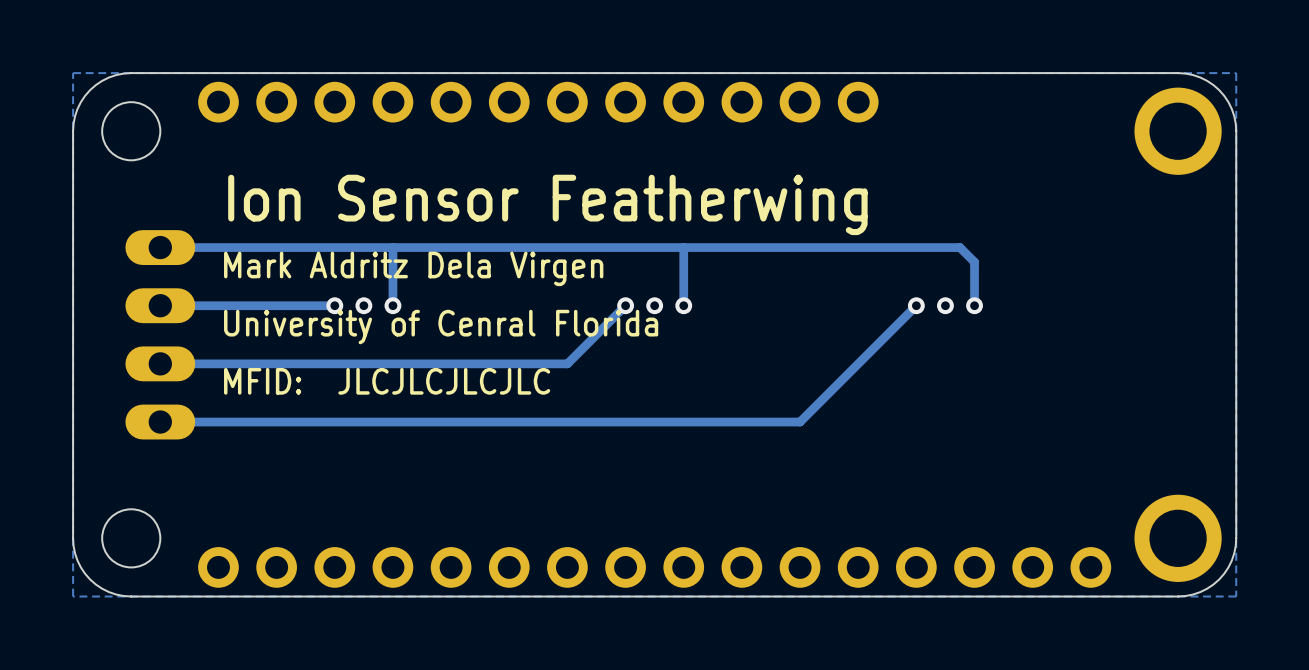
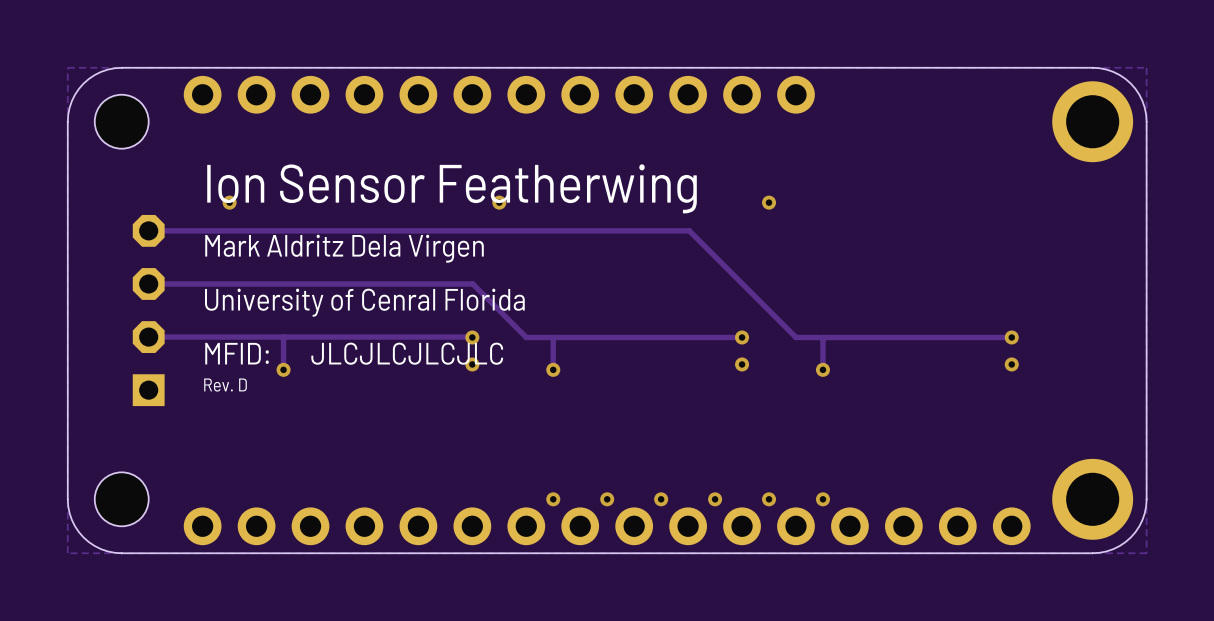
via: none -> (229, 202)
via: none -> (499, 202)
via: none -> (769, 202)
part footprint: [125, 230, 196, 440] -> [132, 214, 165, 407]
track: (160, 247) (959, 247) (974, 262) (974, 305) -> none
track: (392, 247) (392, 305) -> none
track: (683, 247) (683, 305) -> none
track: none -> (148, 230) (689, 230) (795, 337) (1011, 337)
track: (334, 305) (160, 305) -> (742, 337) (526, 337) (472, 283) (148, 283)
via: (334, 305) -> none
via: (363, 305) -> none
via: (392, 305) -> none
track: (625, 305) (567, 363) (160, 363) -> (472, 337) (148, 337)
via: (625, 305) -> none
via: (654, 305) -> none
via: (683, 305) -> none
track: (916, 305) (800, 422) (160, 422) -> none
via: (916, 305) -> none
via: (945, 305) -> none
via: (974, 305) -> none
track: none -> (283, 337) (283, 369)
via: none -> (472, 337)
track: none -> (553, 337) (553, 369)
via: none -> (742, 337)
track: none -> (822, 337) (822, 369)
via: none -> (1011, 337)
via: none -> (472, 364)
via: none -> (742, 364)
via: none -> (1011, 364)
via: none -> (283, 369)
via: none -> (553, 369)
via: none -> (822, 369)
text: none -> Rev. D (225, 385)
via: none -> (553, 499)
via: none -> (607, 499)
via: none -> (661, 499)
via: none -> (715, 499)
via: none -> (769, 499)
via: none -> (822, 499)

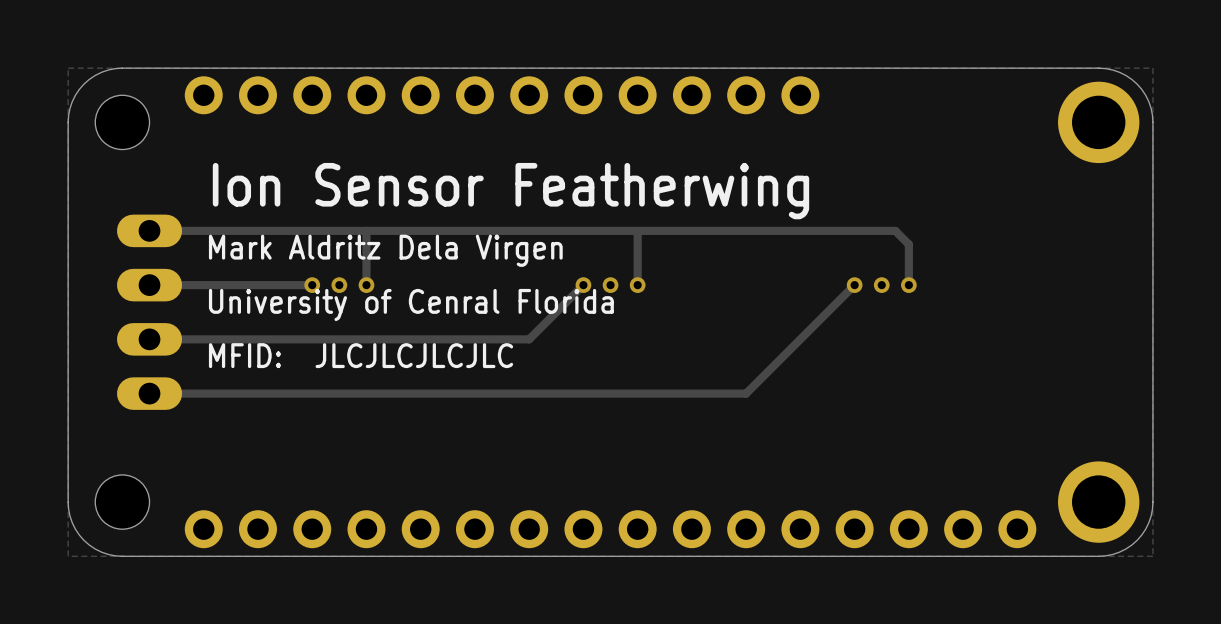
via: (229, 202) -> none
via: (499, 202) -> none
via: (769, 202) -> none
part footprint: [132, 214, 165, 407] -> [116, 214, 183, 410]
track: none -> (149, 230) (895, 230) (908, 244) (908, 285)
track: none -> (366, 230) (366, 285)
track: none -> (637, 230) (637, 285)
track: (148, 230) (689, 230) (795, 337) (1011, 337) -> none
track: (148, 283) (472, 283) (526, 337) (742, 337) -> (149, 285) (312, 285)
via: none -> (312, 285)
via: none -> (339, 285)
via: none -> (366, 285)
via: none -> (583, 285)
via: none -> (610, 285)
via: none -> (637, 285)
track: none -> (854, 285) (746, 393) (149, 393)
via: none -> (854, 285)
via: none -> (881, 285)
via: none -> (908, 285)
track: (148, 337) (472, 337) -> (149, 339) (529, 339) (583, 285)
track: (283, 337) (283, 369) -> none
via: (472, 337) -> none
track: (553, 337) (553, 369) -> none
via: (742, 337) -> none
track: (822, 337) (822, 369) -> none
via: (1011, 337) -> none
via: (472, 364) -> none
via: (742, 364) -> none
via: (1011, 364) -> none
via: (283, 369) -> none
via: (553, 369) -> none
via: (822, 369) -> none
text: Rev. D (225, 385) -> none
via: (553, 499) -> none
via: (607, 499) -> none
via: (661, 499) -> none
via: (715, 499) -> none
via: (769, 499) -> none
via: (822, 499) -> none

